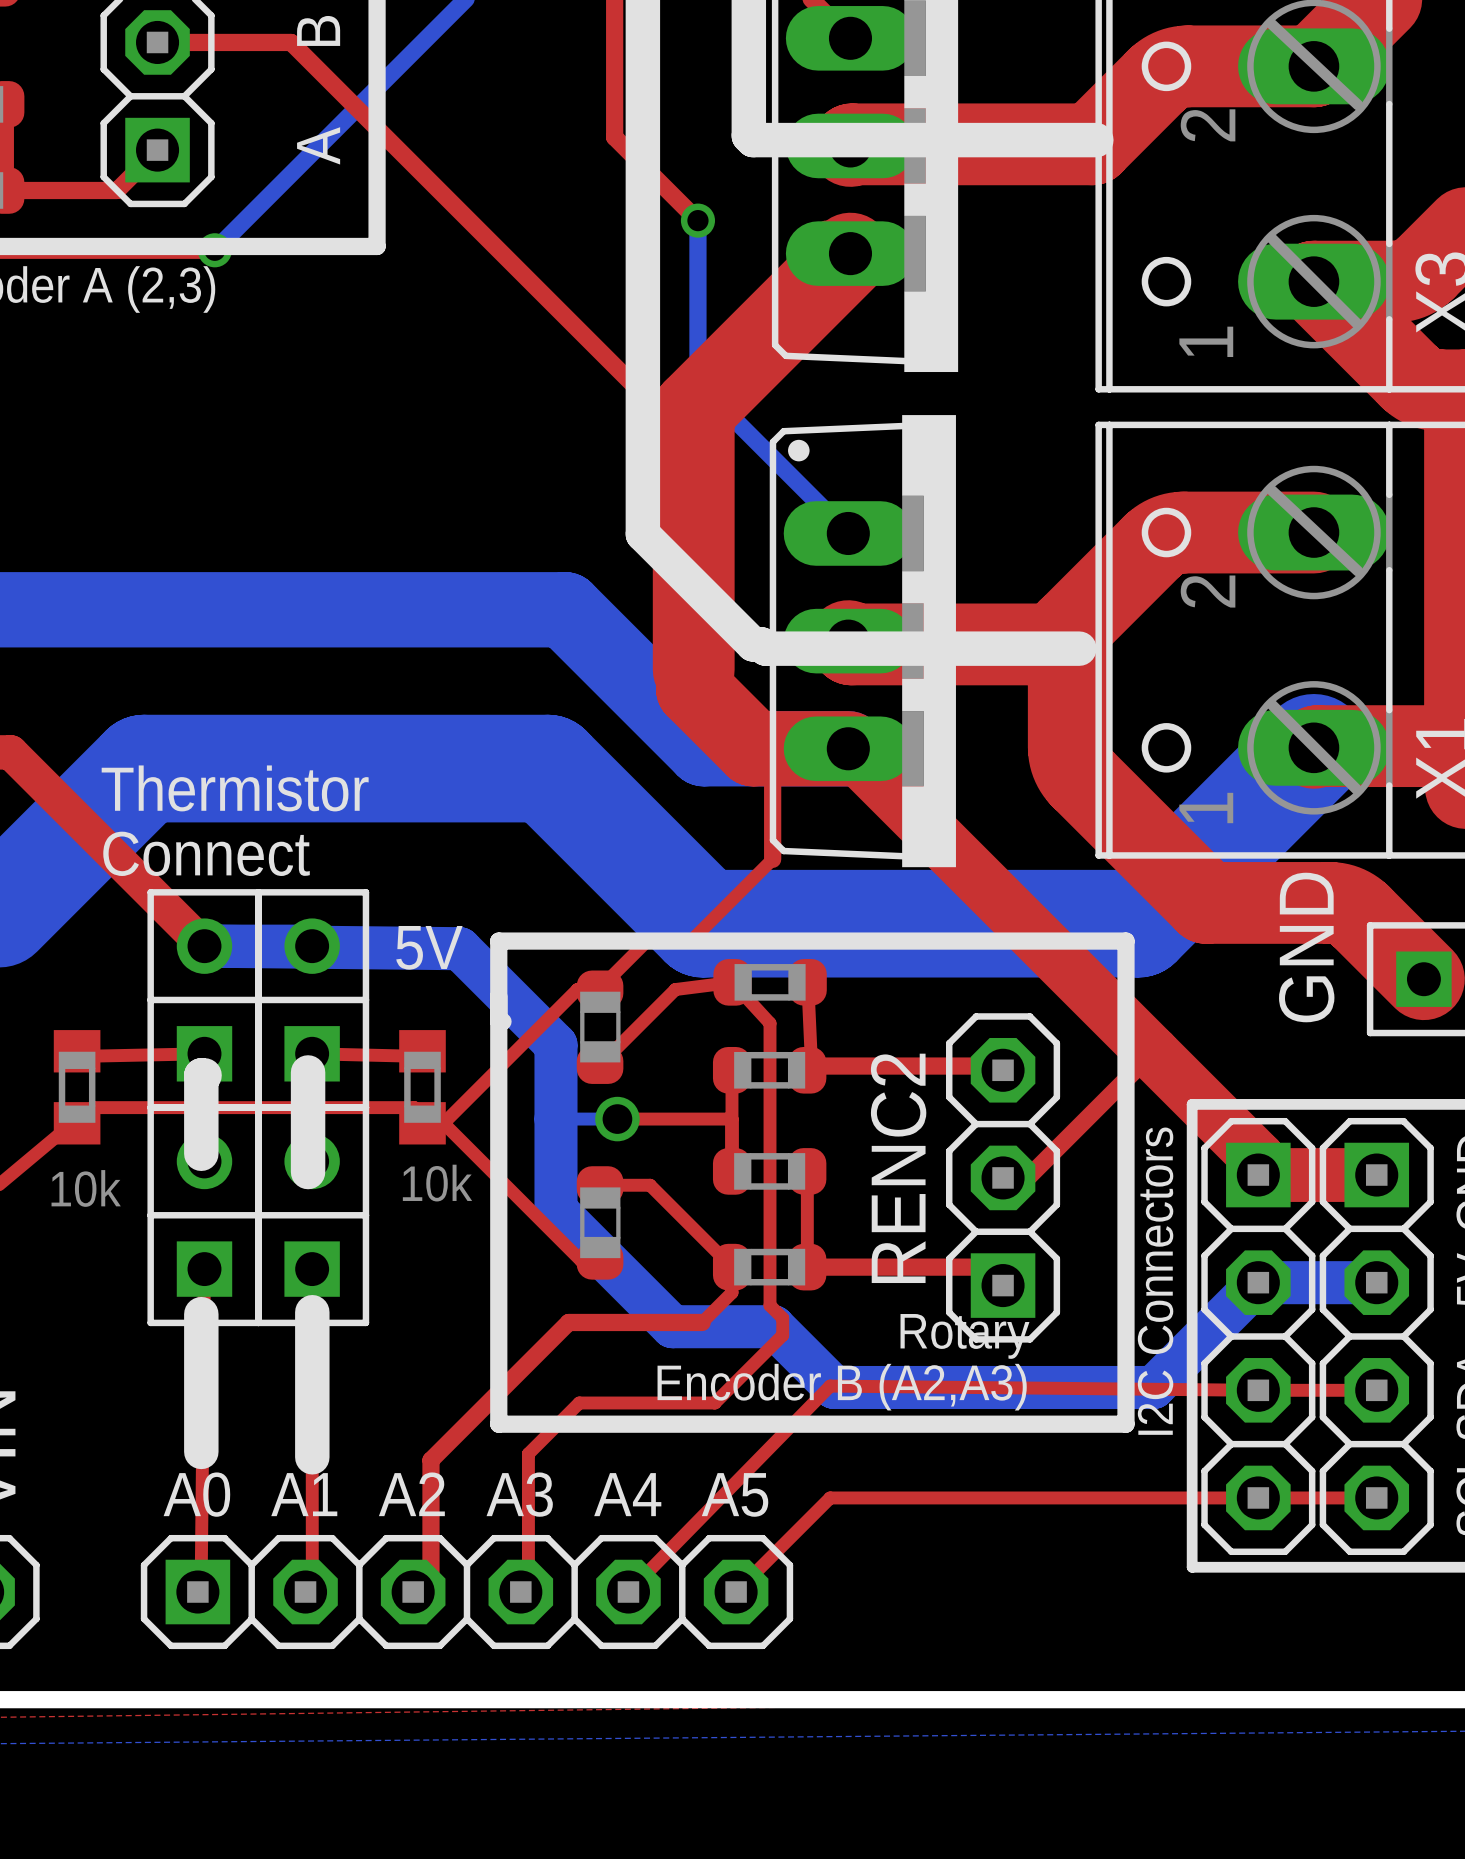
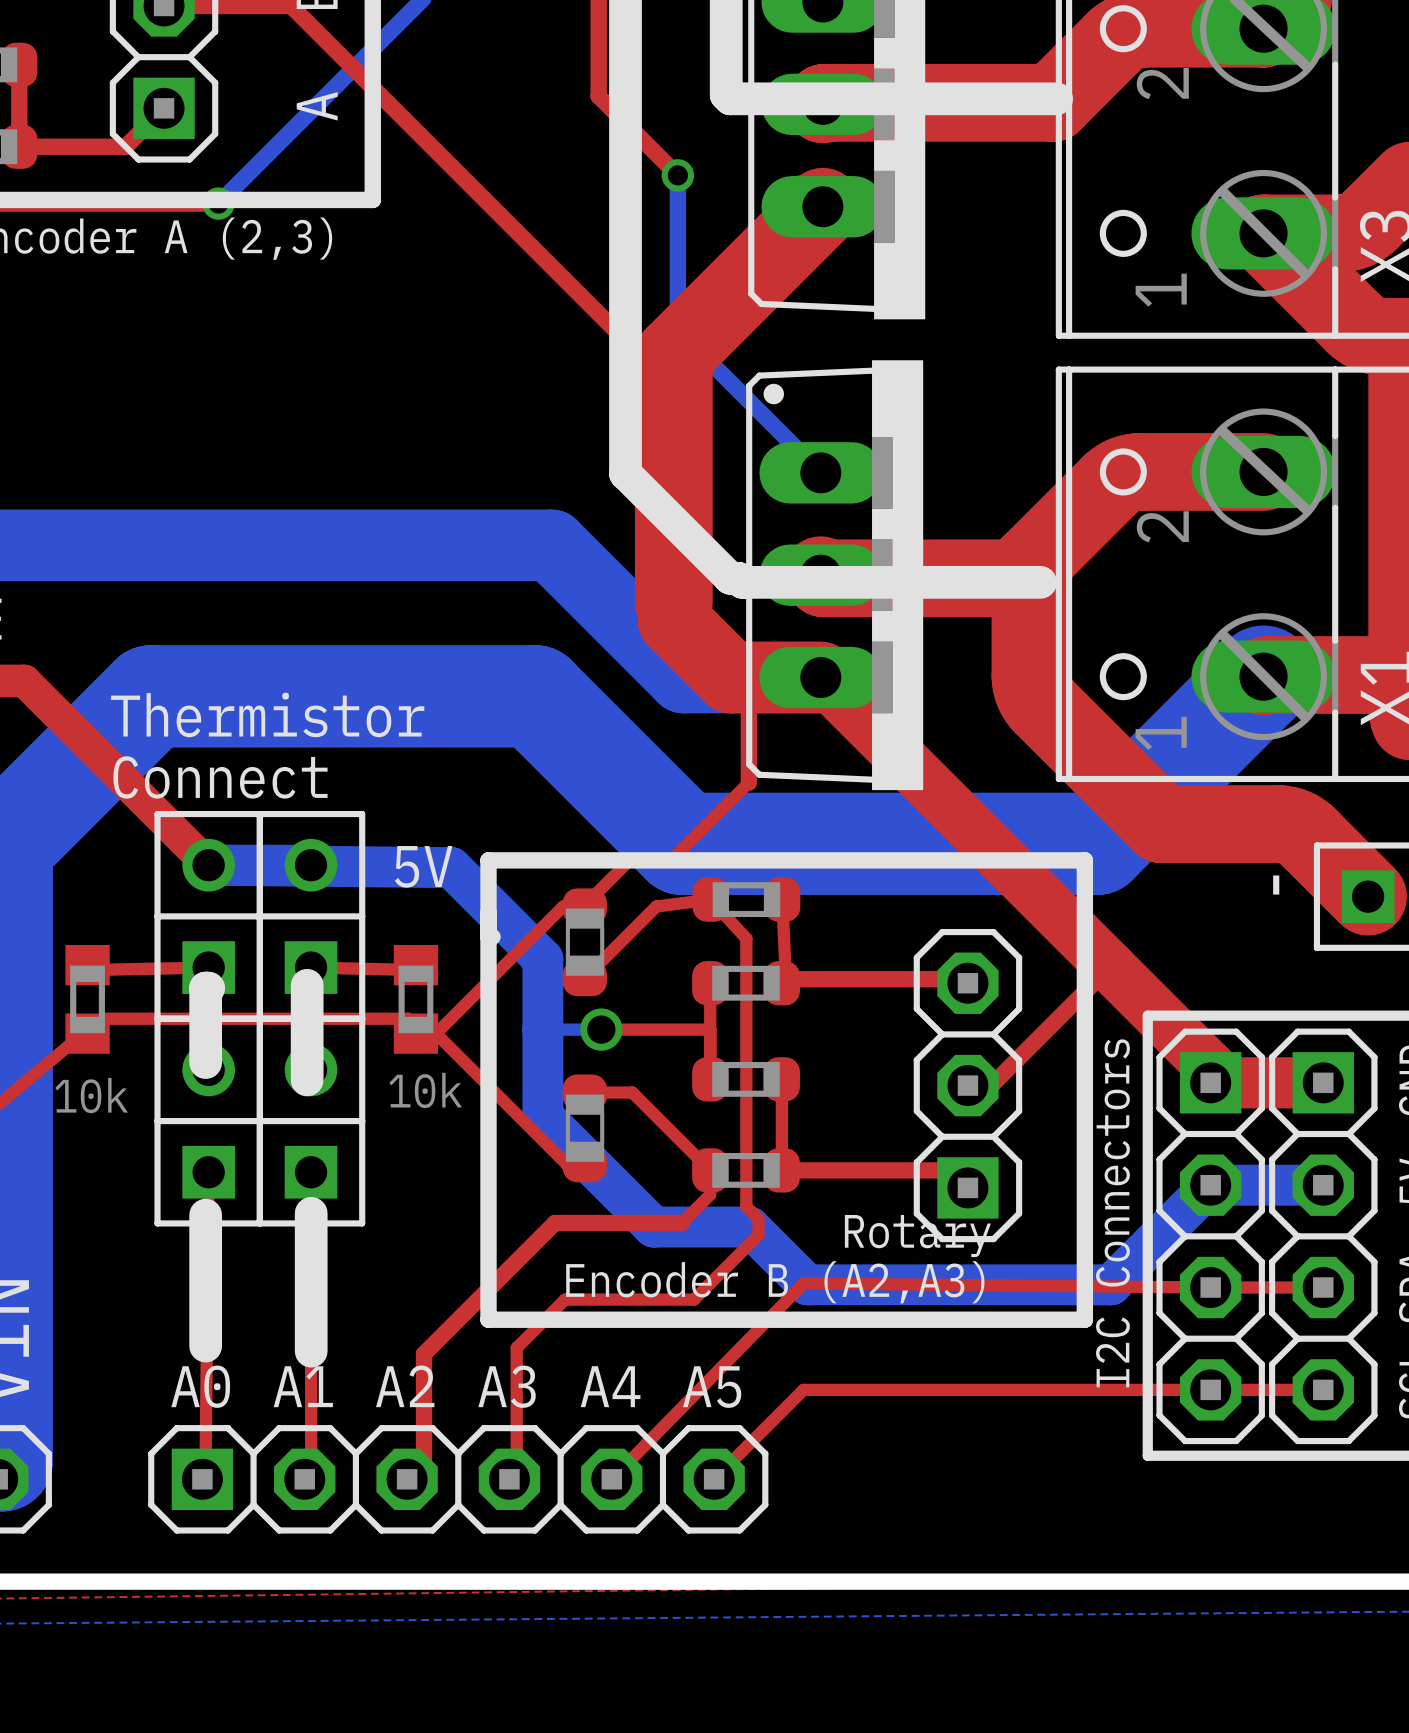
text: GND (1306, 947) -> - (1276, 885)
RENC2 name: RENC2 (898, 1168) -> none

